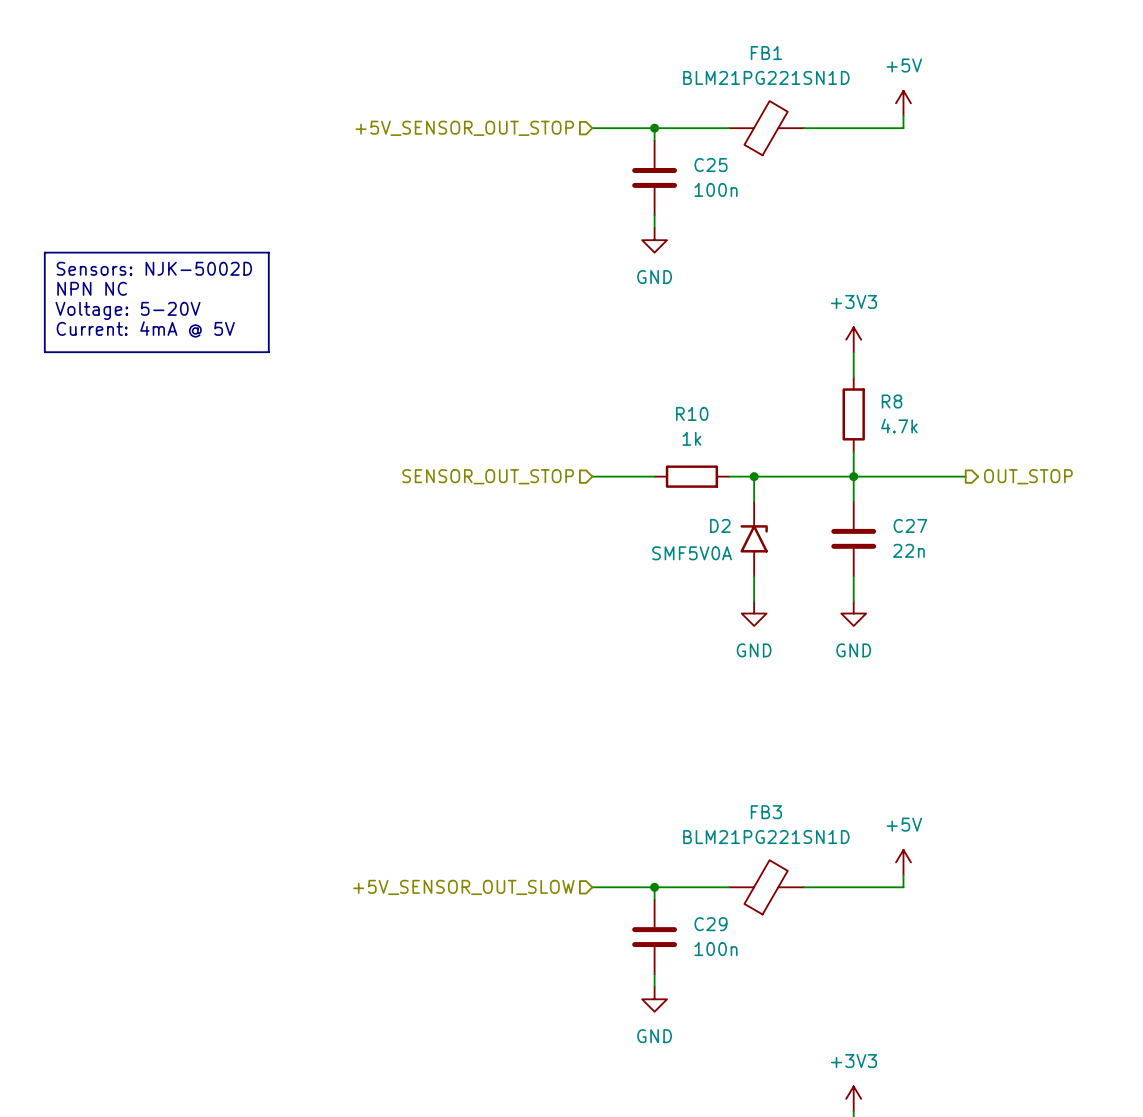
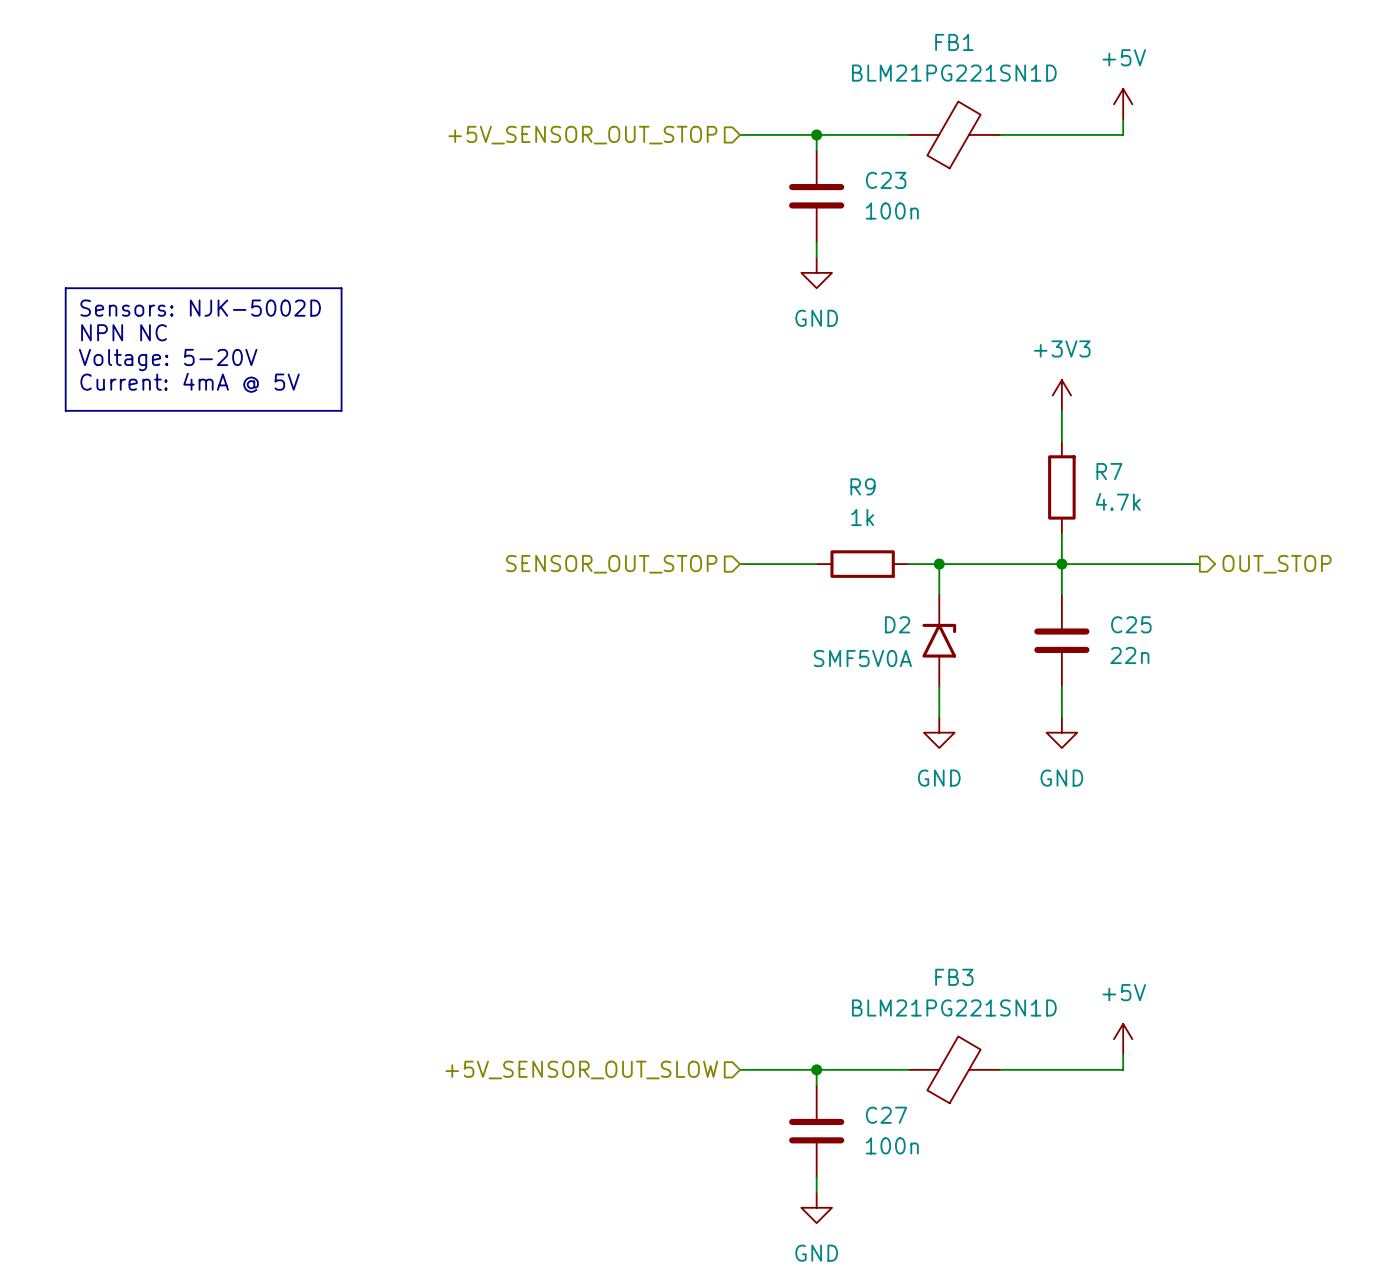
C25 name: C25 (710, 165) -> C23 (886, 180)
R8 name: R8 (892, 401) -> R7 (1109, 471)
R10 name: R10 (692, 413) -> R9 (863, 486)
C27 name: C27 (910, 525) -> C25 (1131, 624)
C29 name: C29 (710, 924) -> C27 (886, 1115)

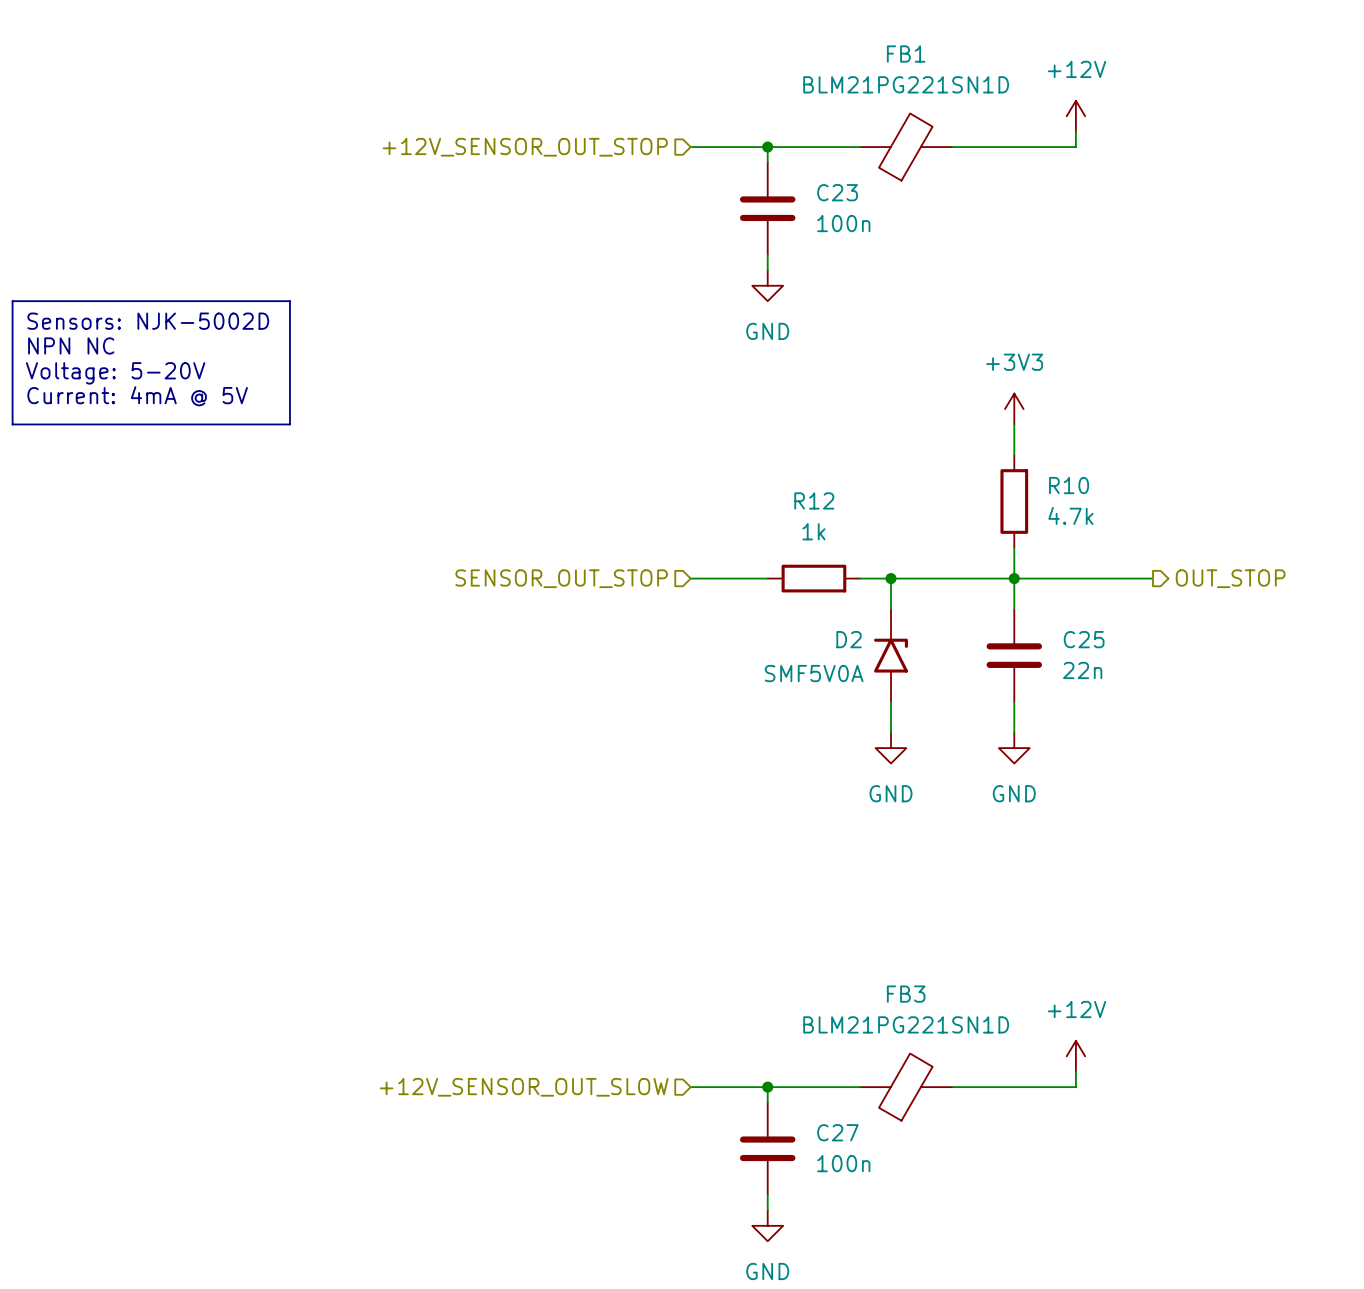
power symbol: +5V (1123, 104) -> +12V (1075, 116)
hierarchical label: +5V_SENSOR_OUT_STOP (582, 135) -> +12V_SENSOR_OUT_STOP (525, 147)
R7 name: R7 (1109, 471) -> R10 (1069, 485)
R9 name: R9 (863, 486) -> R12 (814, 500)
power symbol: +5V (1123, 1039) -> +12V (1075, 1056)
hierarchical label: +5V_SENSOR_OUT_SLOW (581, 1070) -> +12V_SENSOR_OUT_SLOW (524, 1087)

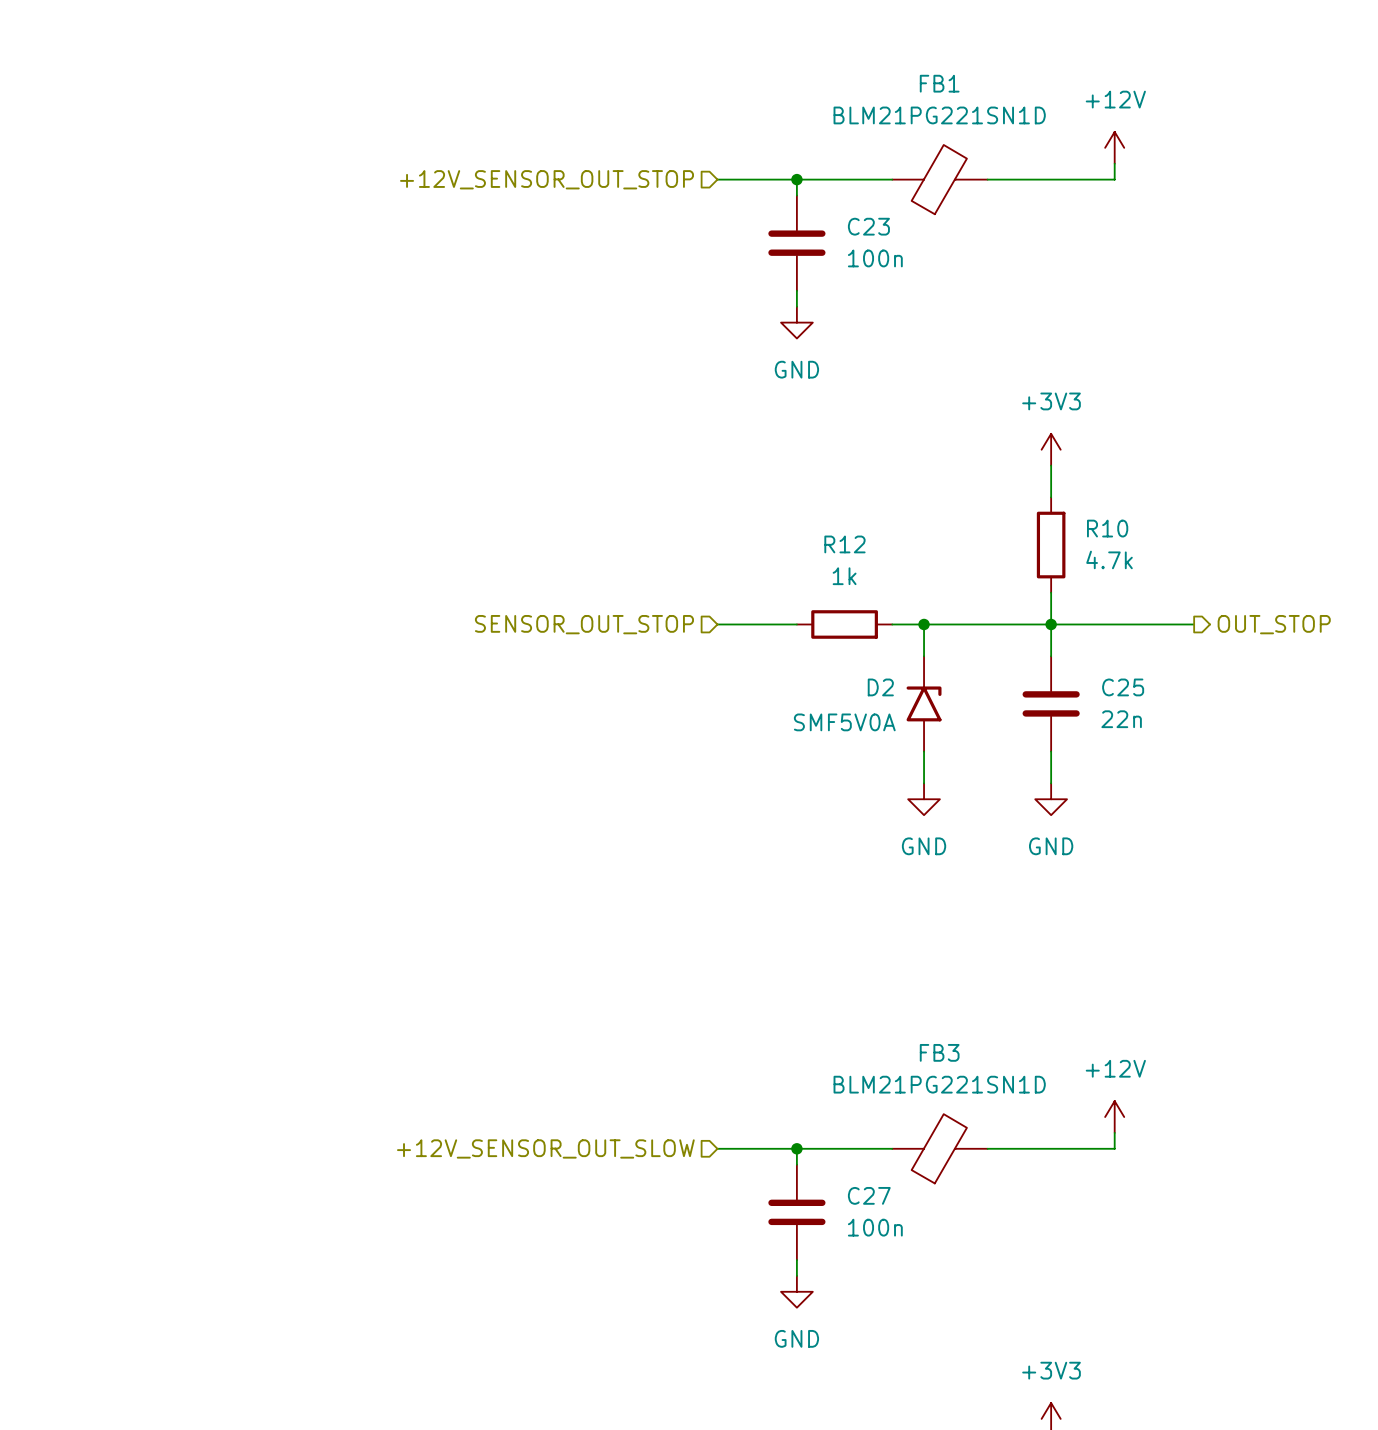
line: (12, 301) (289, 301) (289, 424) (12, 424) (12, 301) -> none
text: Sensors: NJK-5002D (148, 321) -> none
text: NPN NC (71, 345) -> none
text: Voltage: 5-20V (115, 373) -> none
text: Current: 4mA @ 5V (137, 396) -> none

